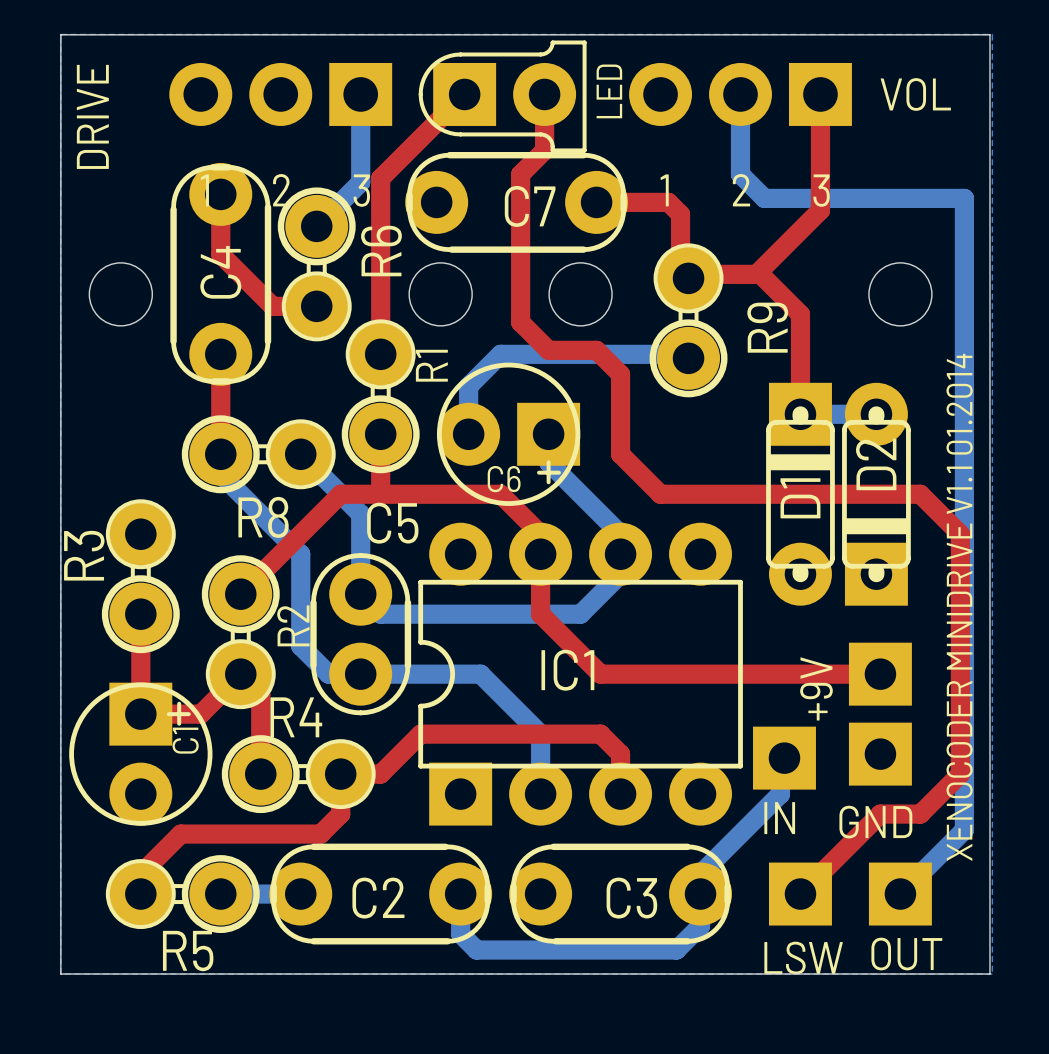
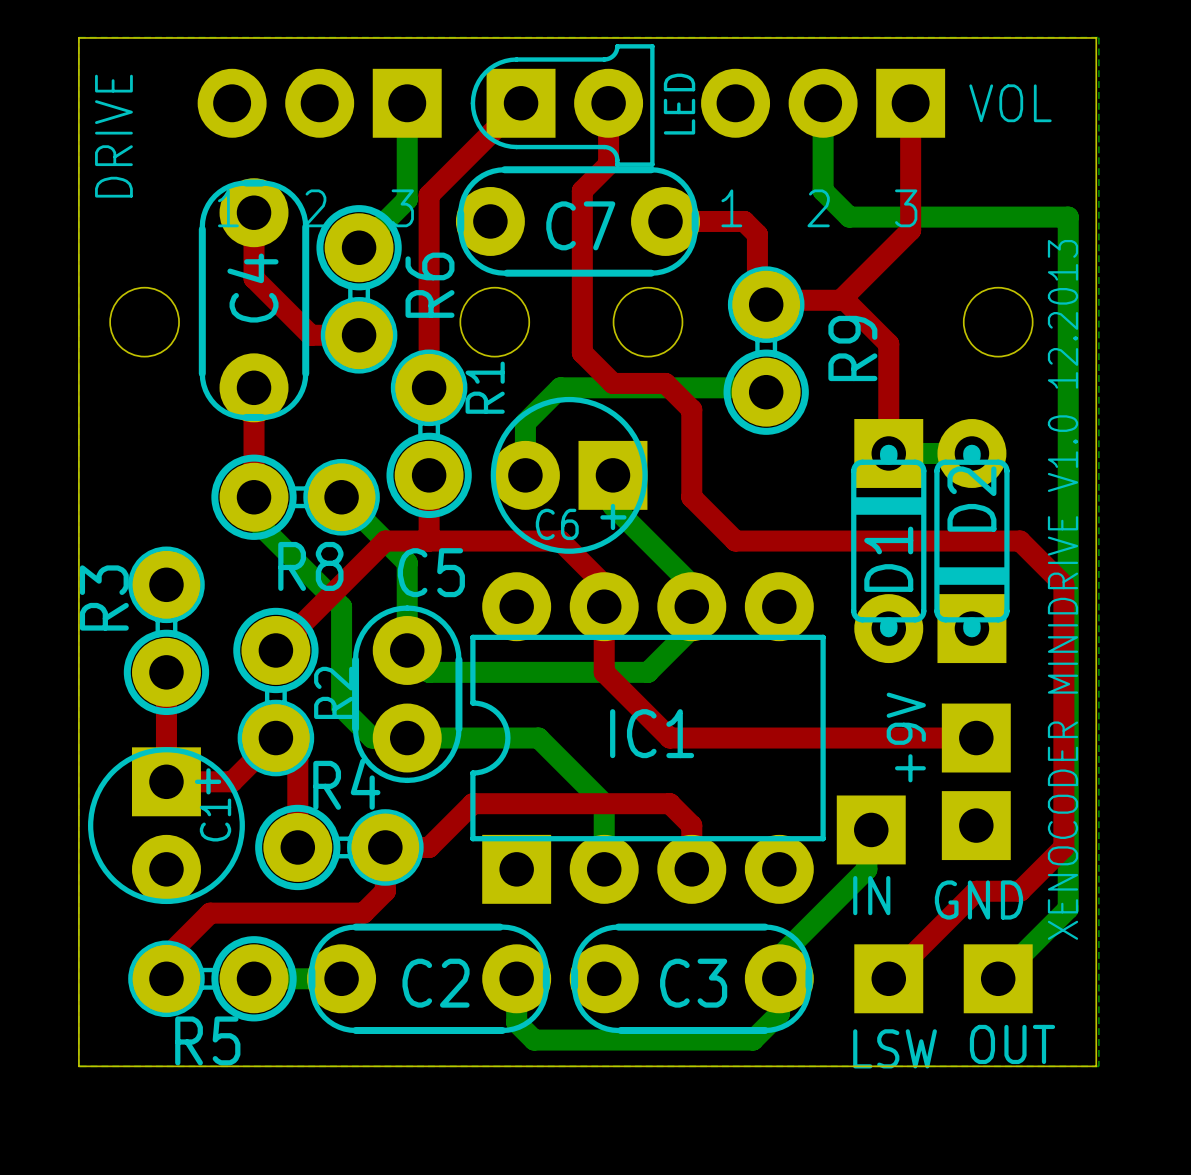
text: XENOCODER MINIDRIVE V1.1 01.2014 (959, 607) -> XENOCODER MINIDRIVE V1.0 12.2013 (1062, 589)

